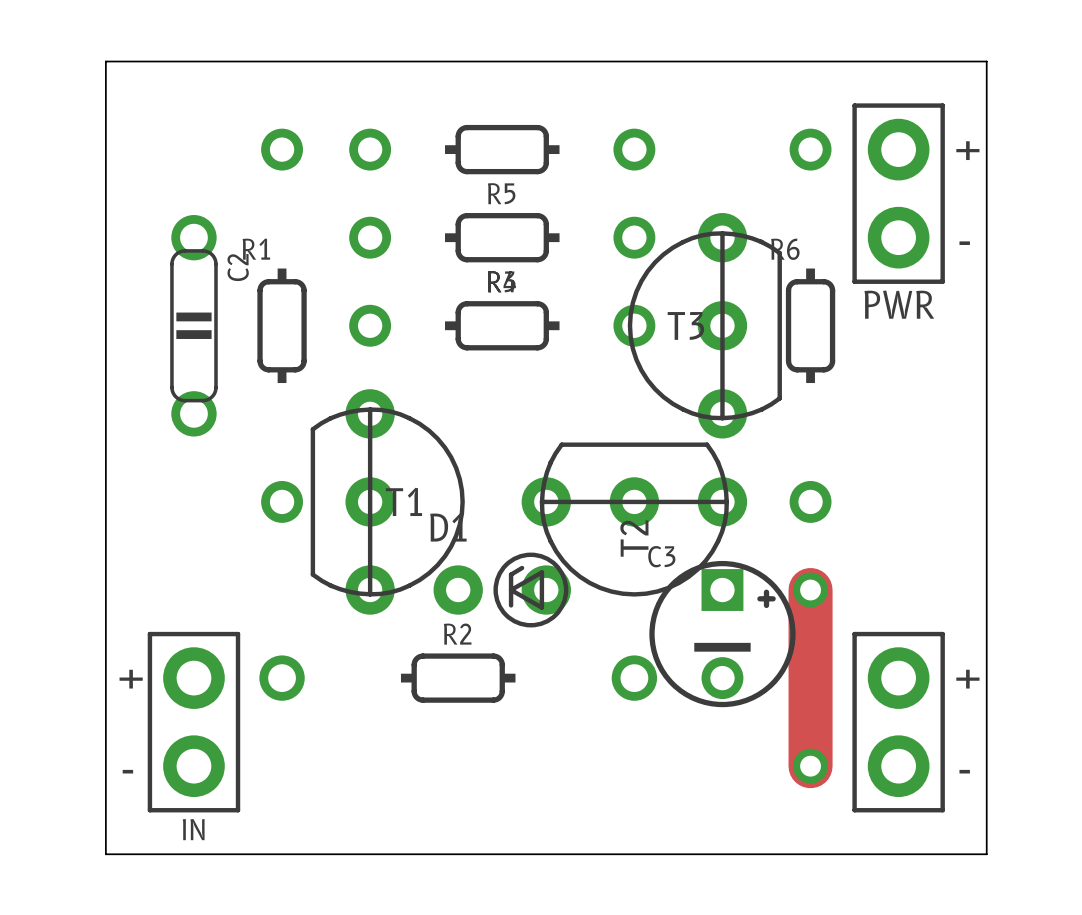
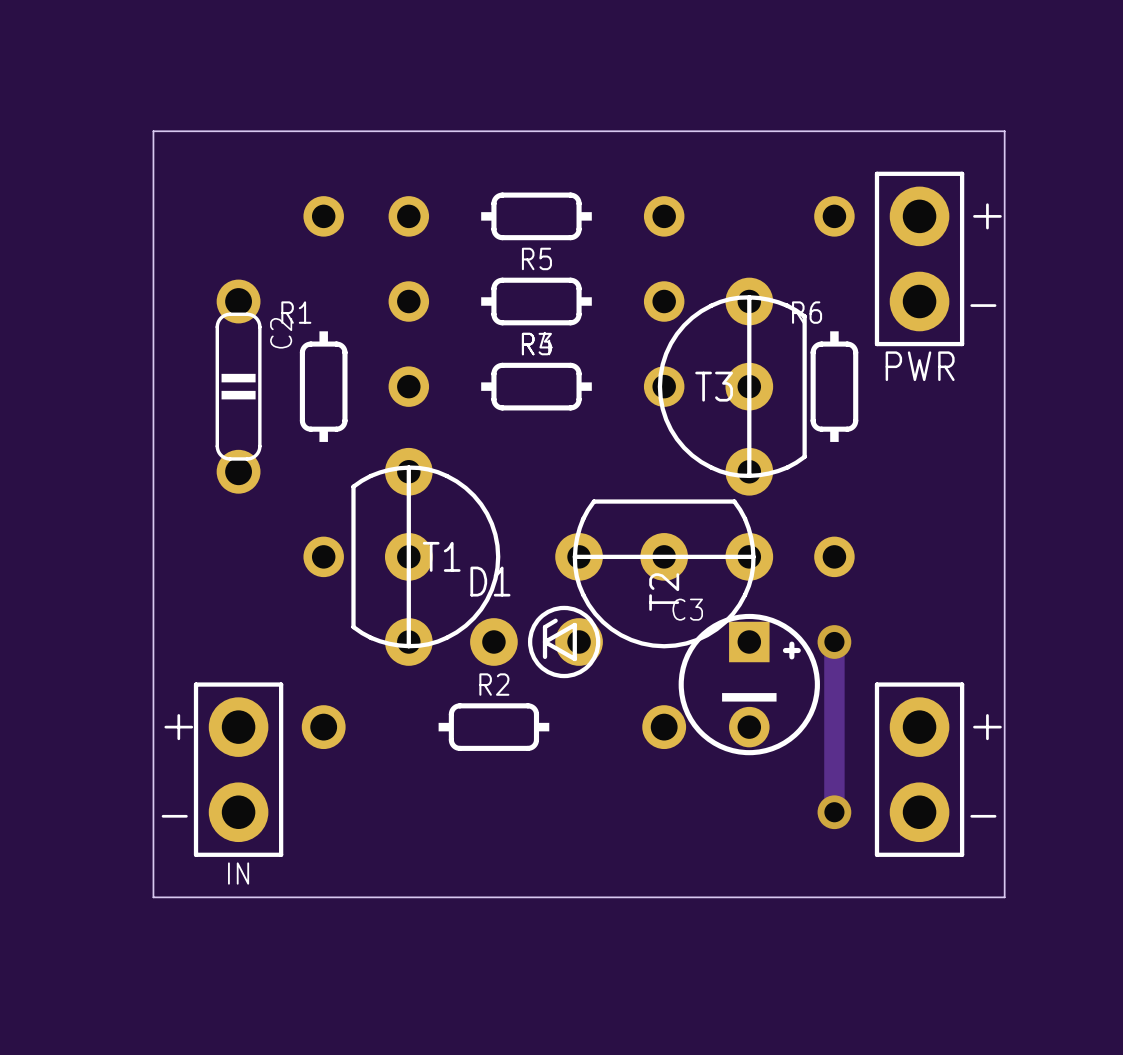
track width: thick (810, 590) (810, 766) -> thin (834, 641) (834, 812)

